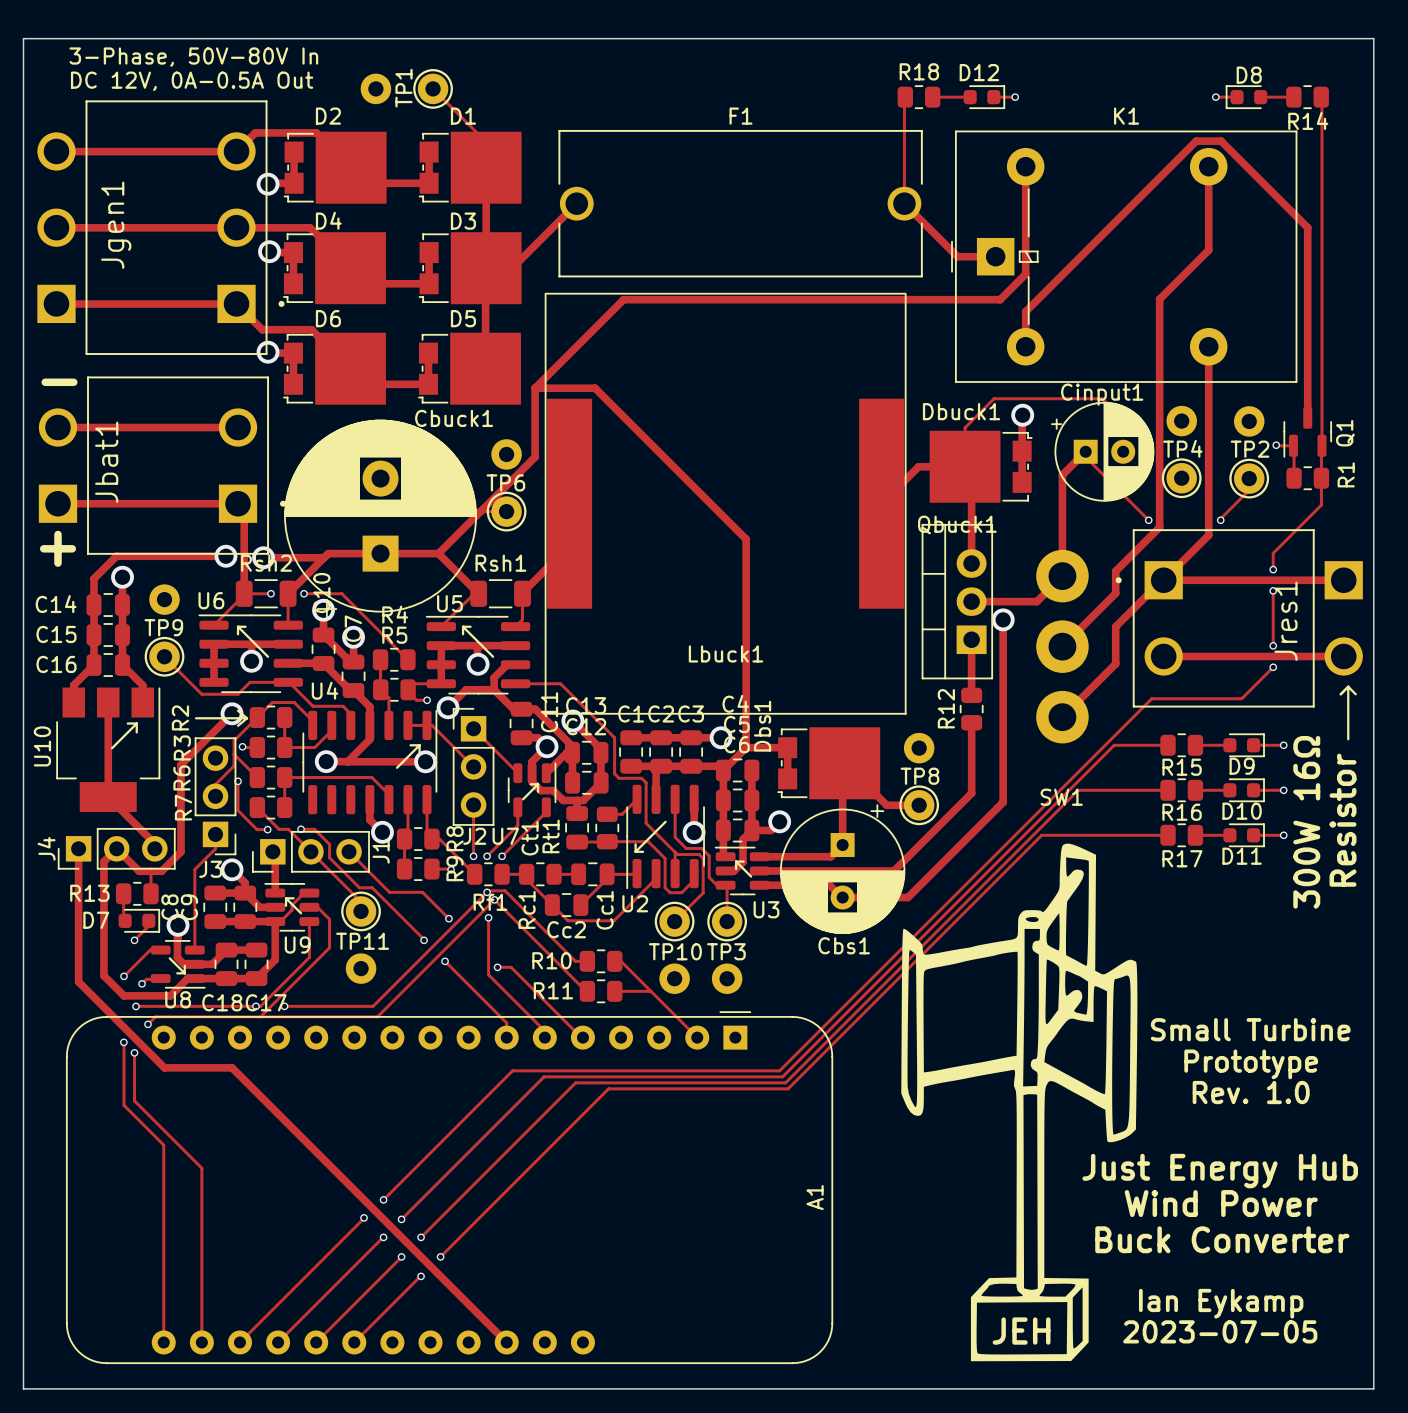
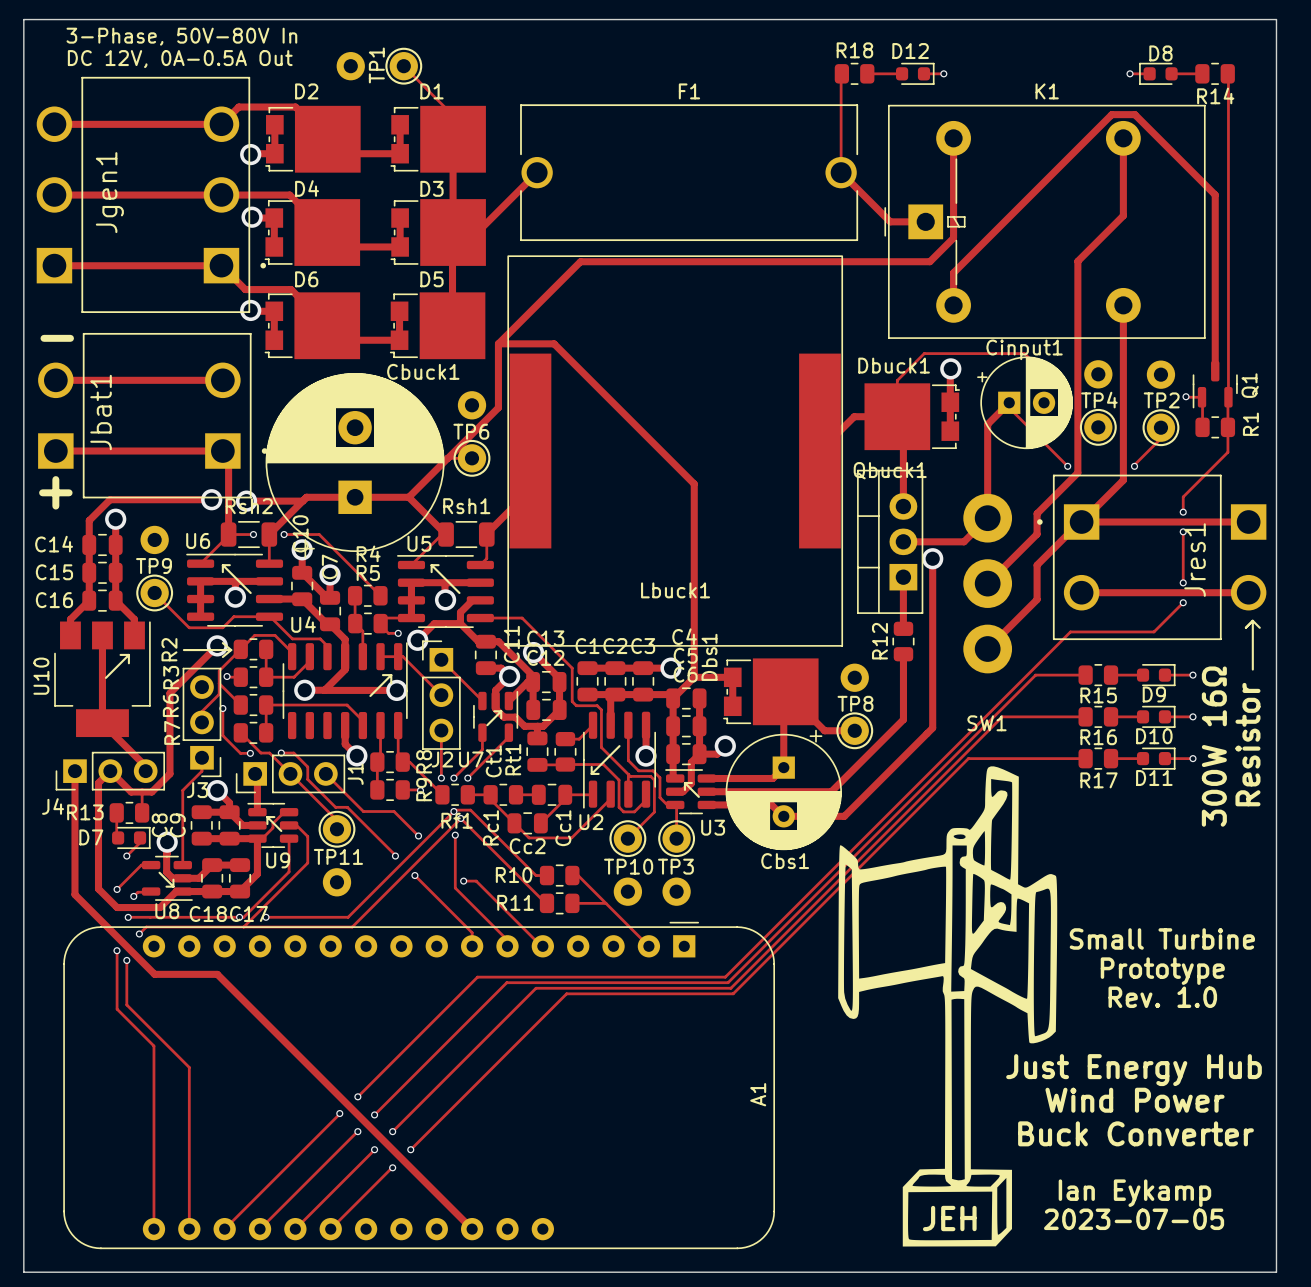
J4 name rotation: 0° (46, 848) -> 90° clockwise (53, 806)
J4 name position: J4 (46, 848) -> J4 (53, 806)

